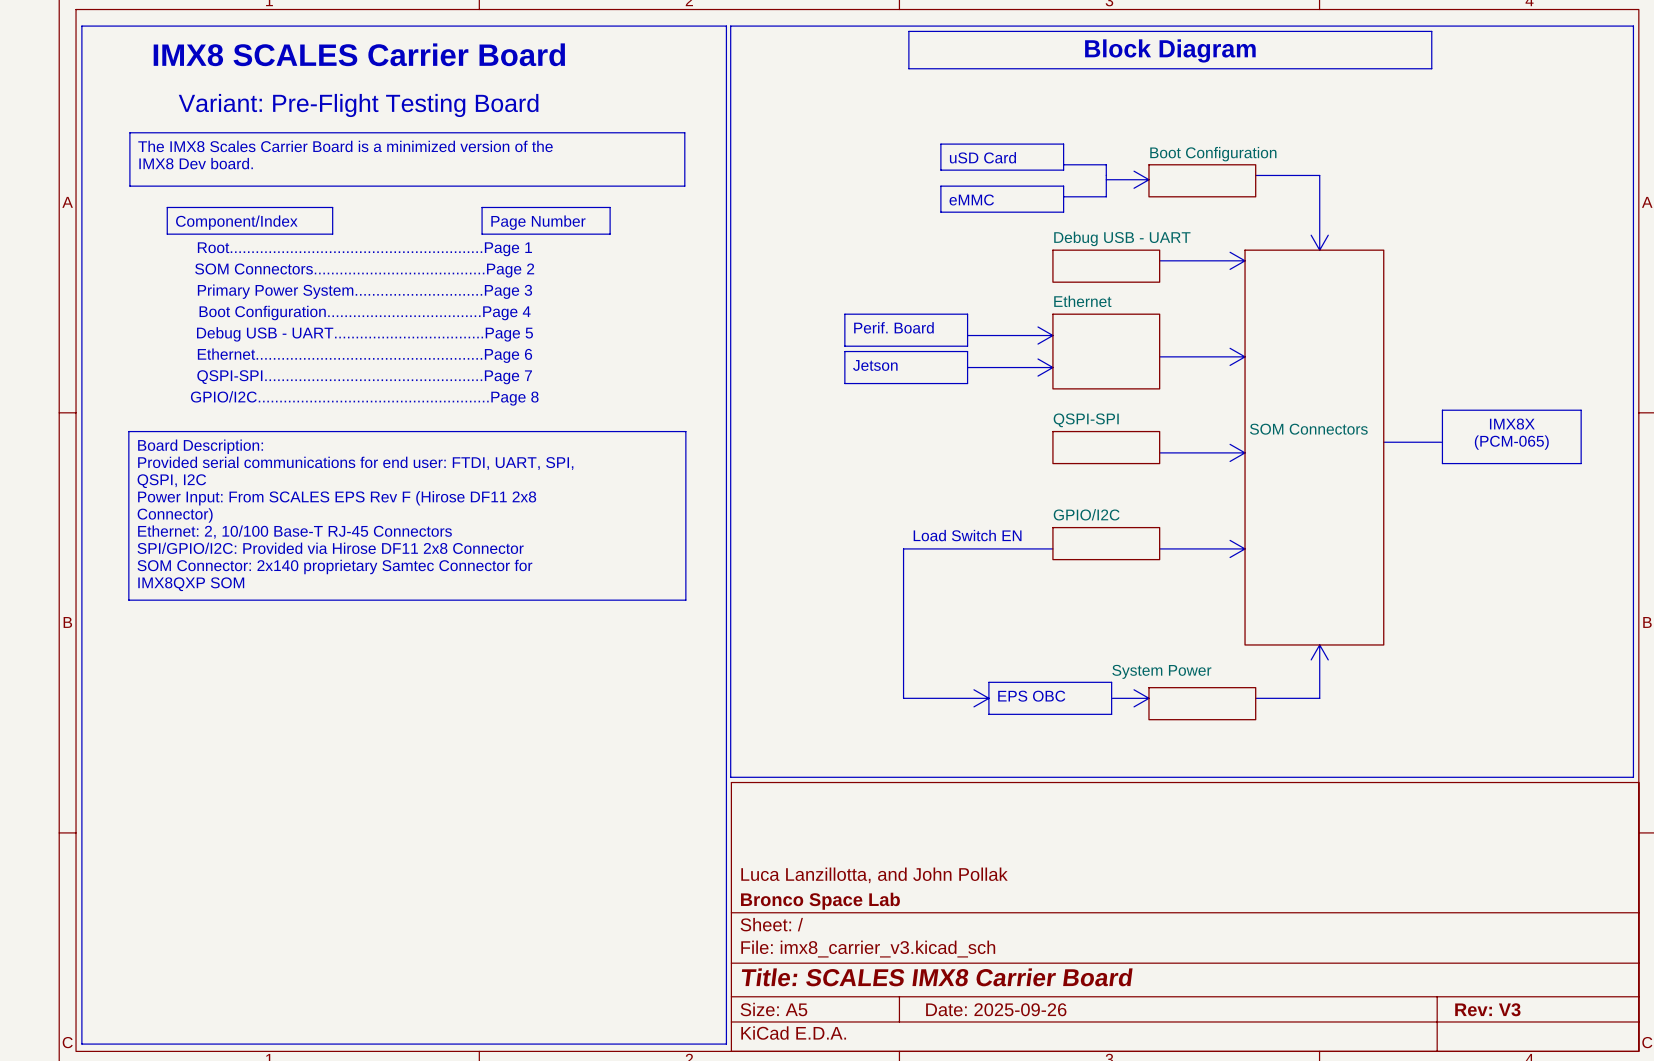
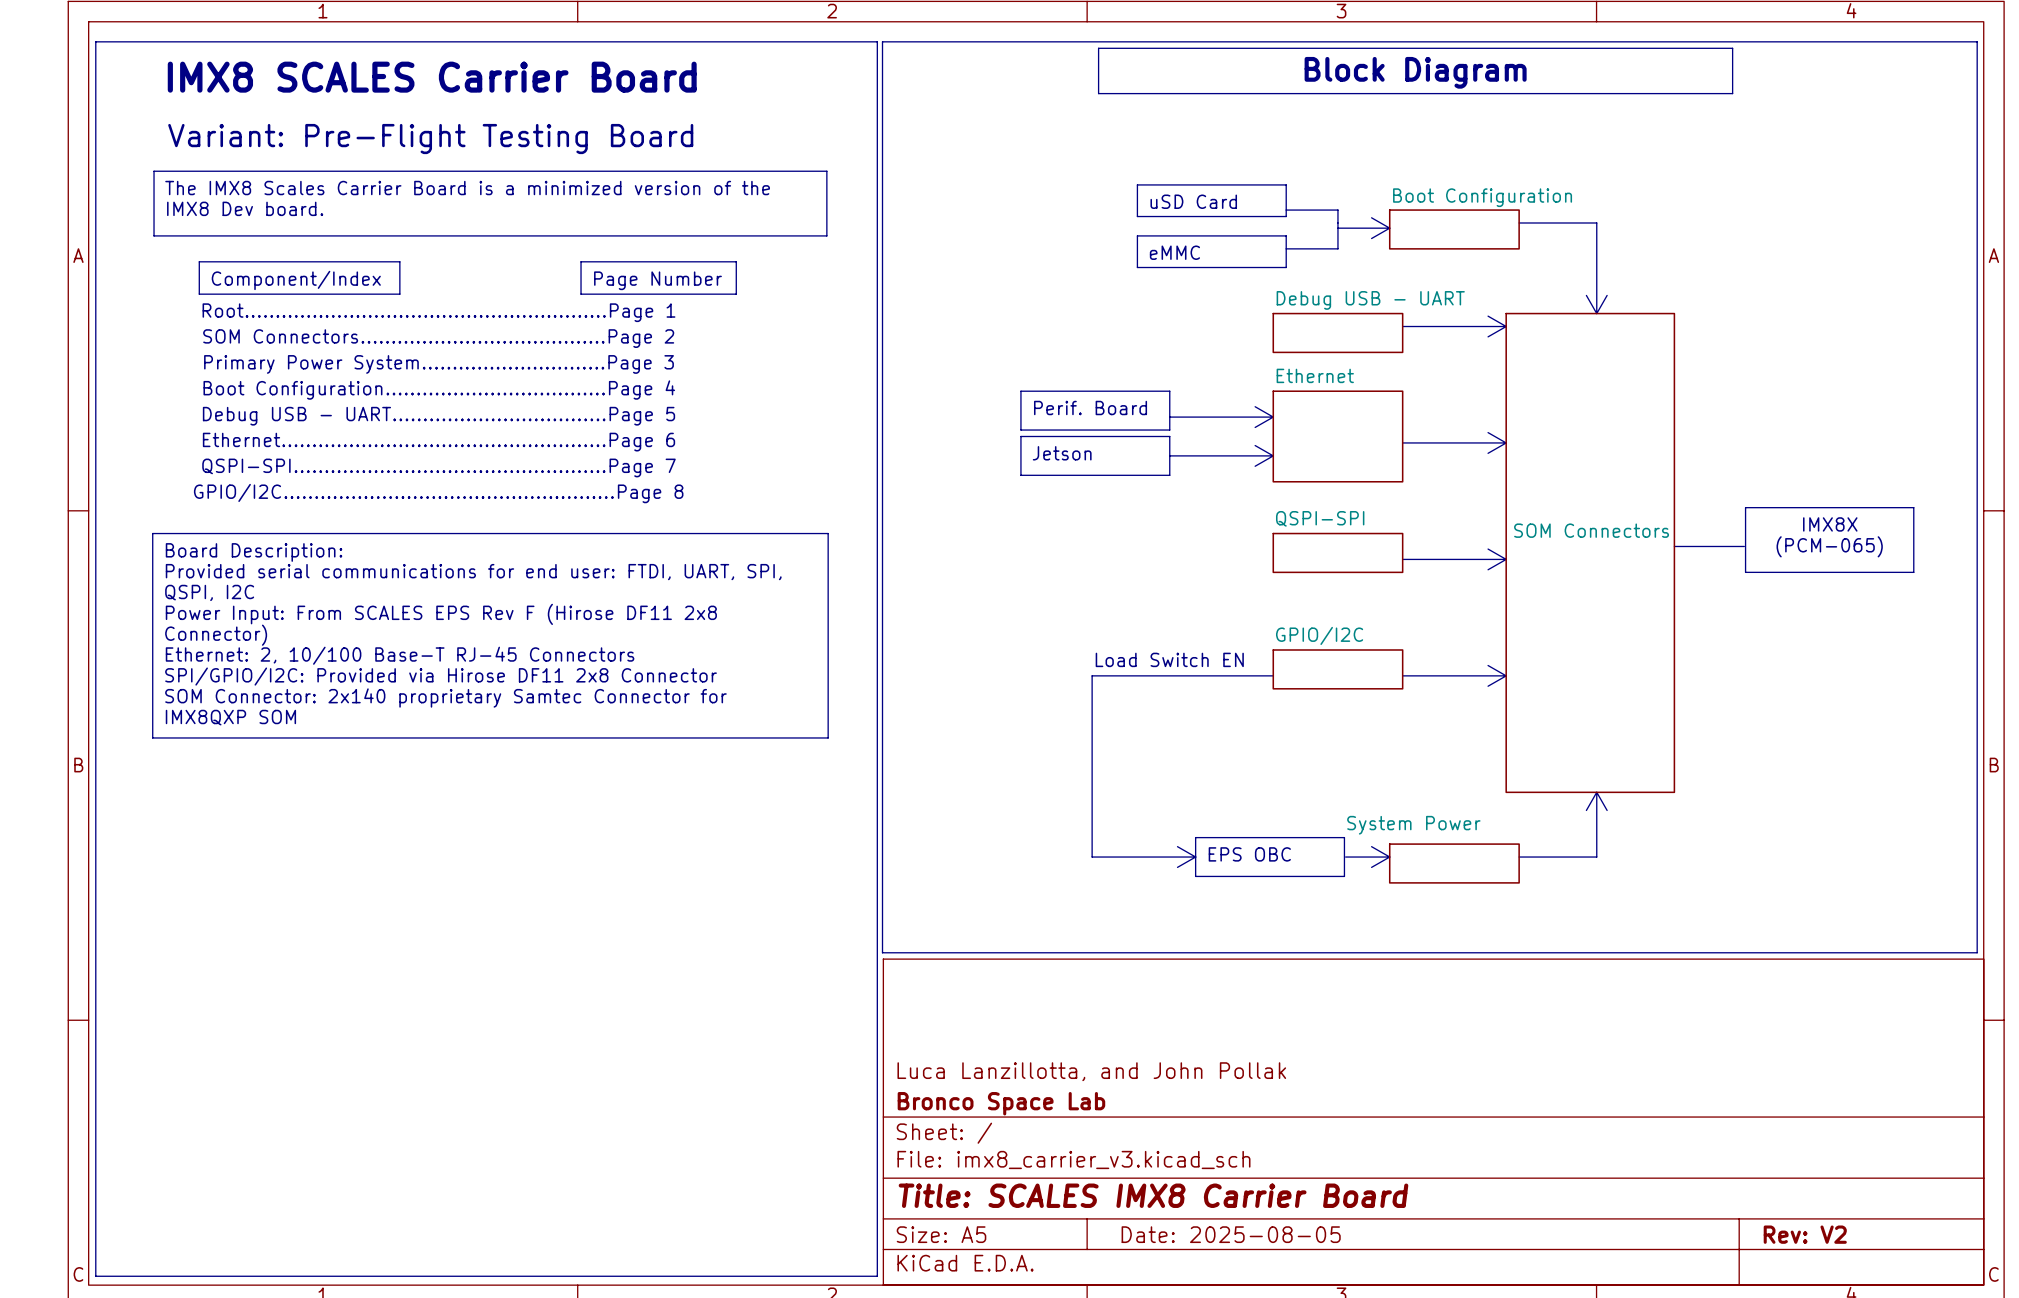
title block: Date: 2025-09-26 (996, 1009) -> Date: 2025-08-05 (1231, 1234)
title block: Rev: V3 (1487, 1009) -> Rev: V2 (1805, 1234)

